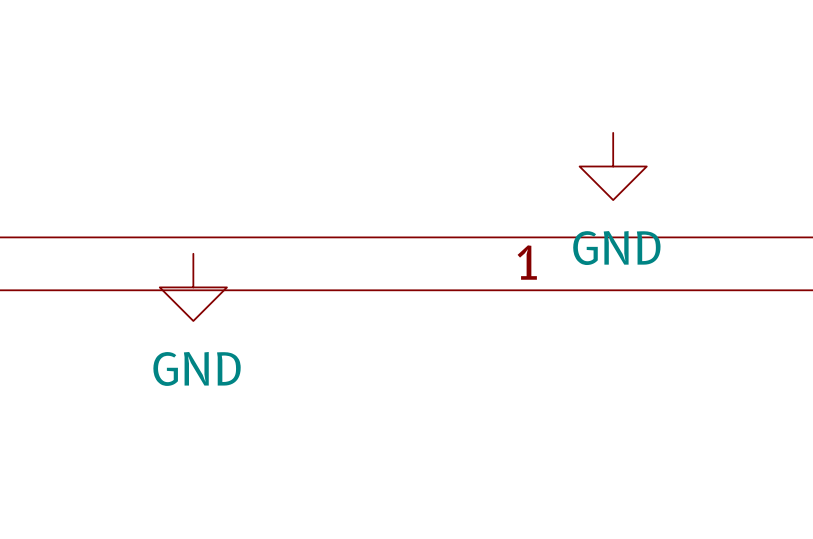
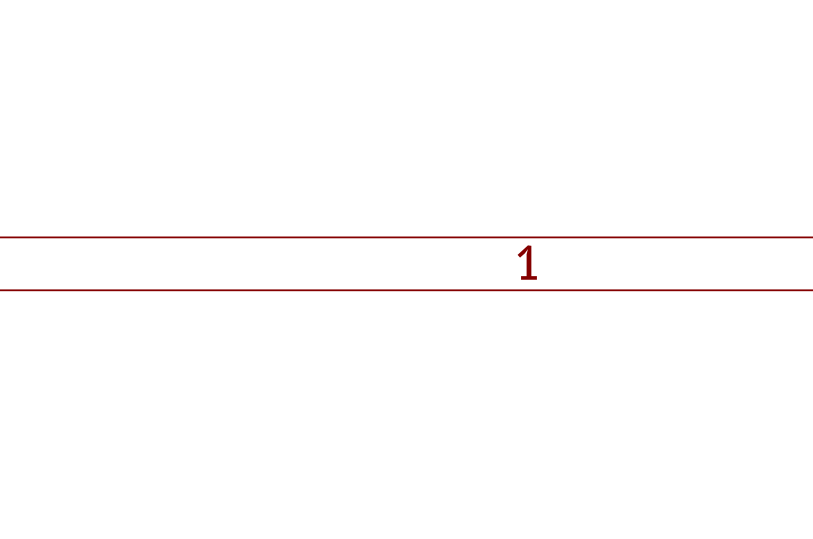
power symbol: GND (613, 166) -> none
power symbol: GND (193, 287) -> none

